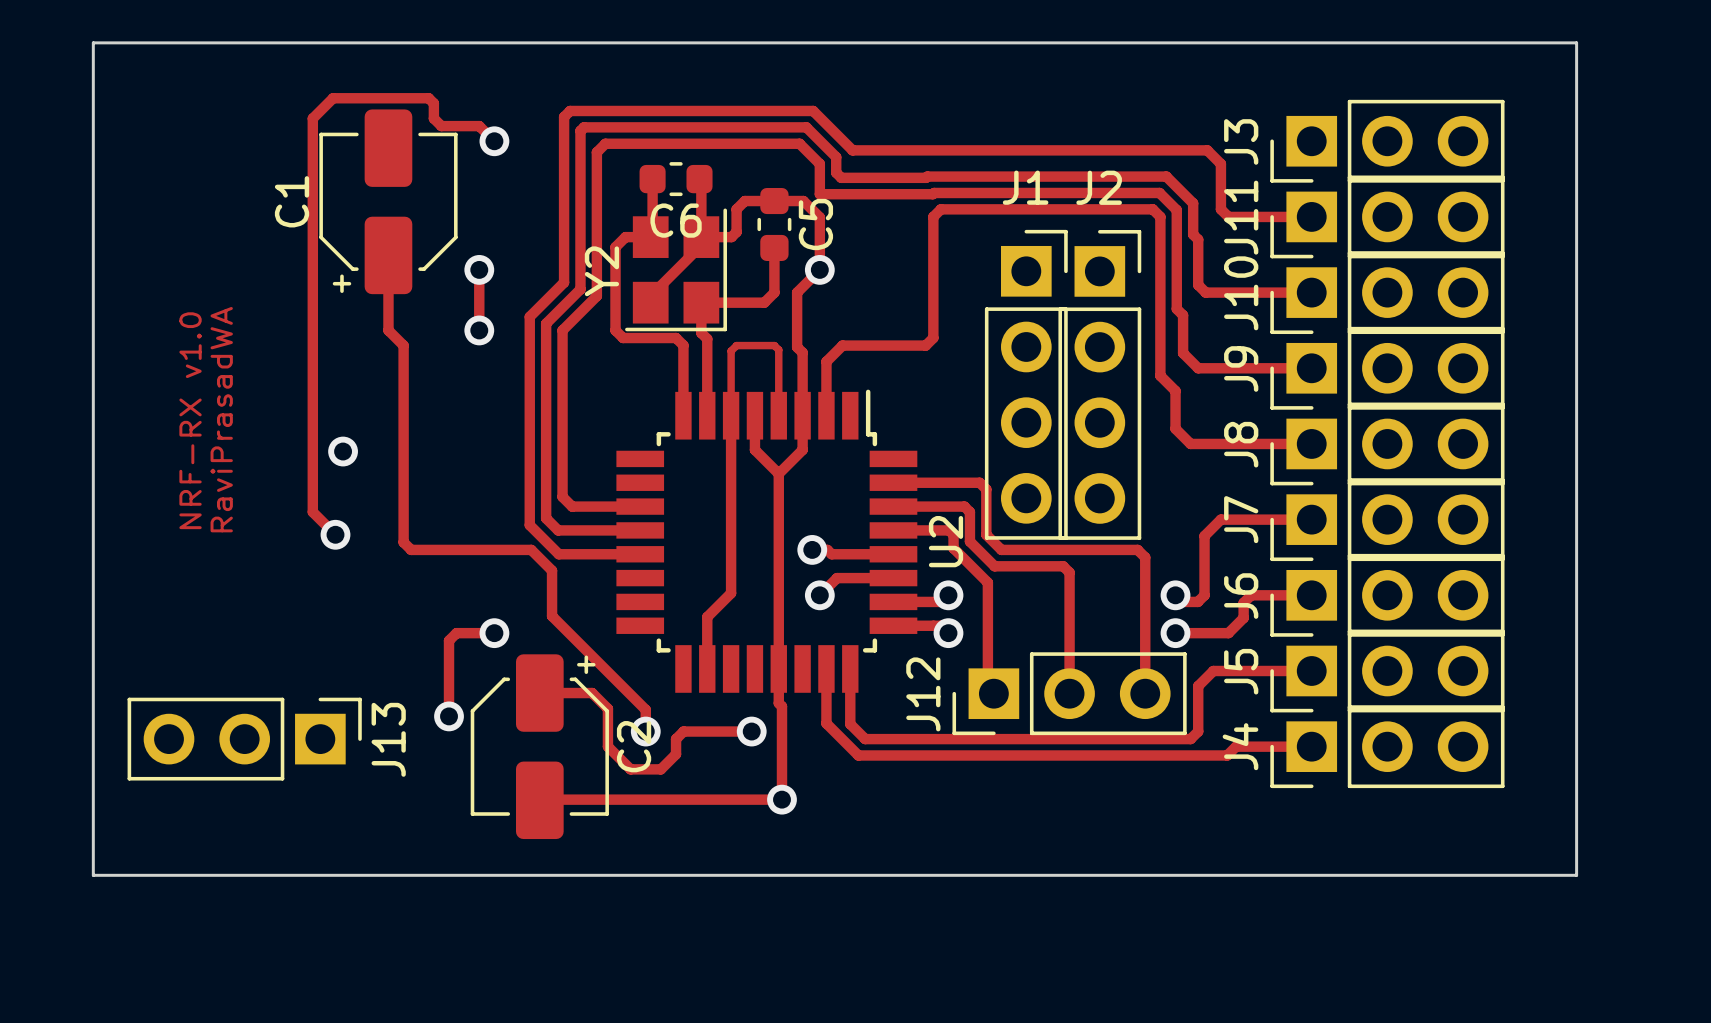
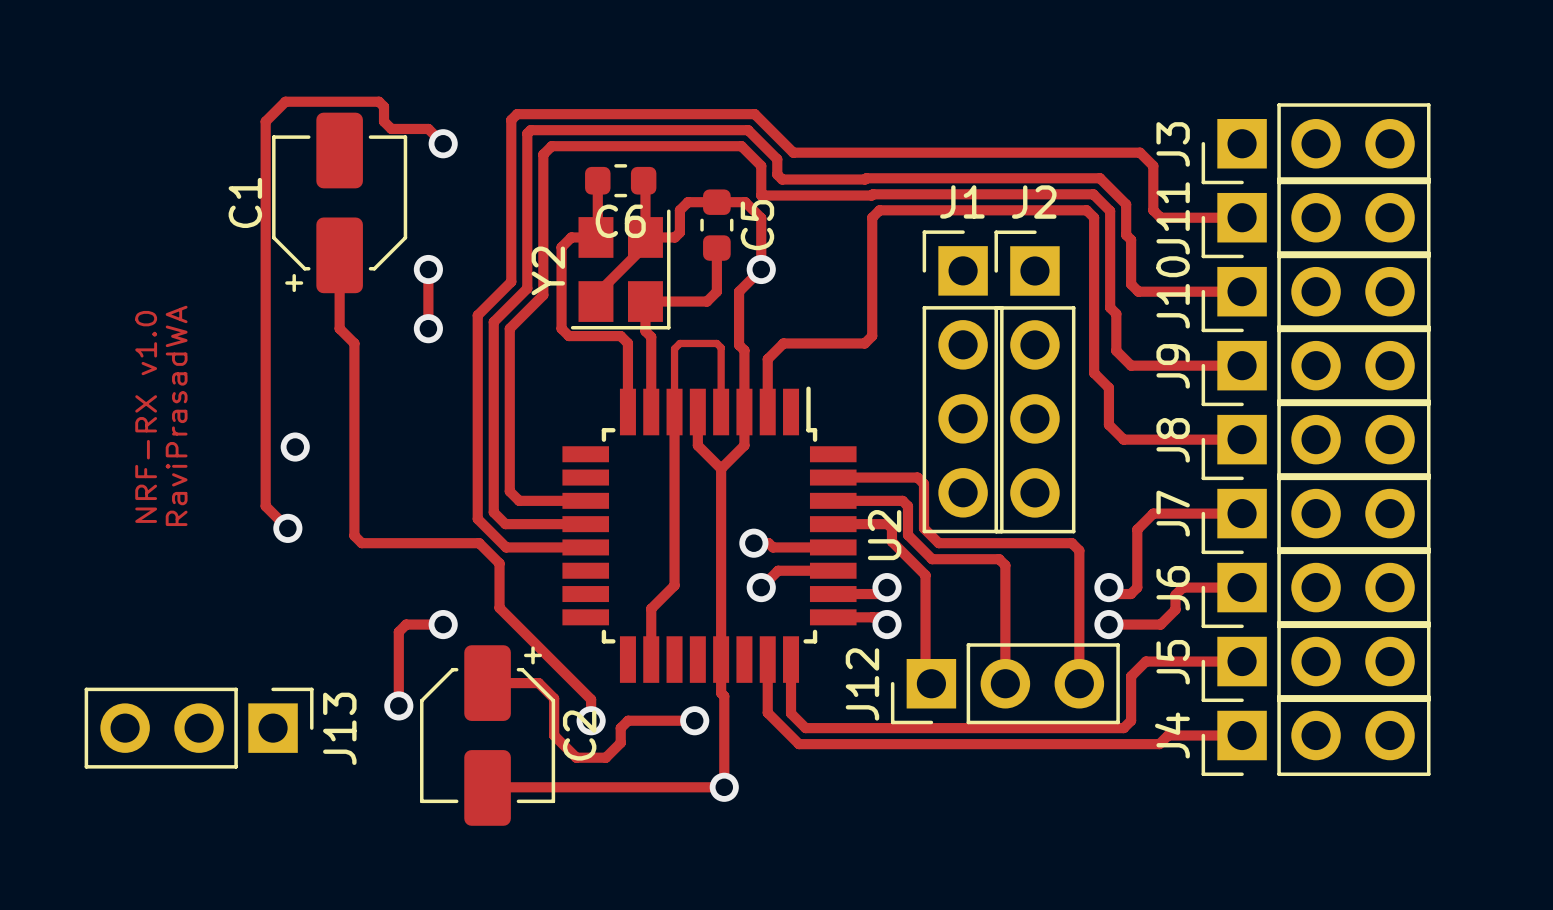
board edge: (93, 42) (1576, 42) (1576, 875) (93, 875) (93, 42) -> none
J1 footprint: [984, 229, 1068, 540] -> [922, 230, 1004, 534]
J2 footprint: [1058, 230, 1142, 540] -> [994, 230, 1076, 534]

